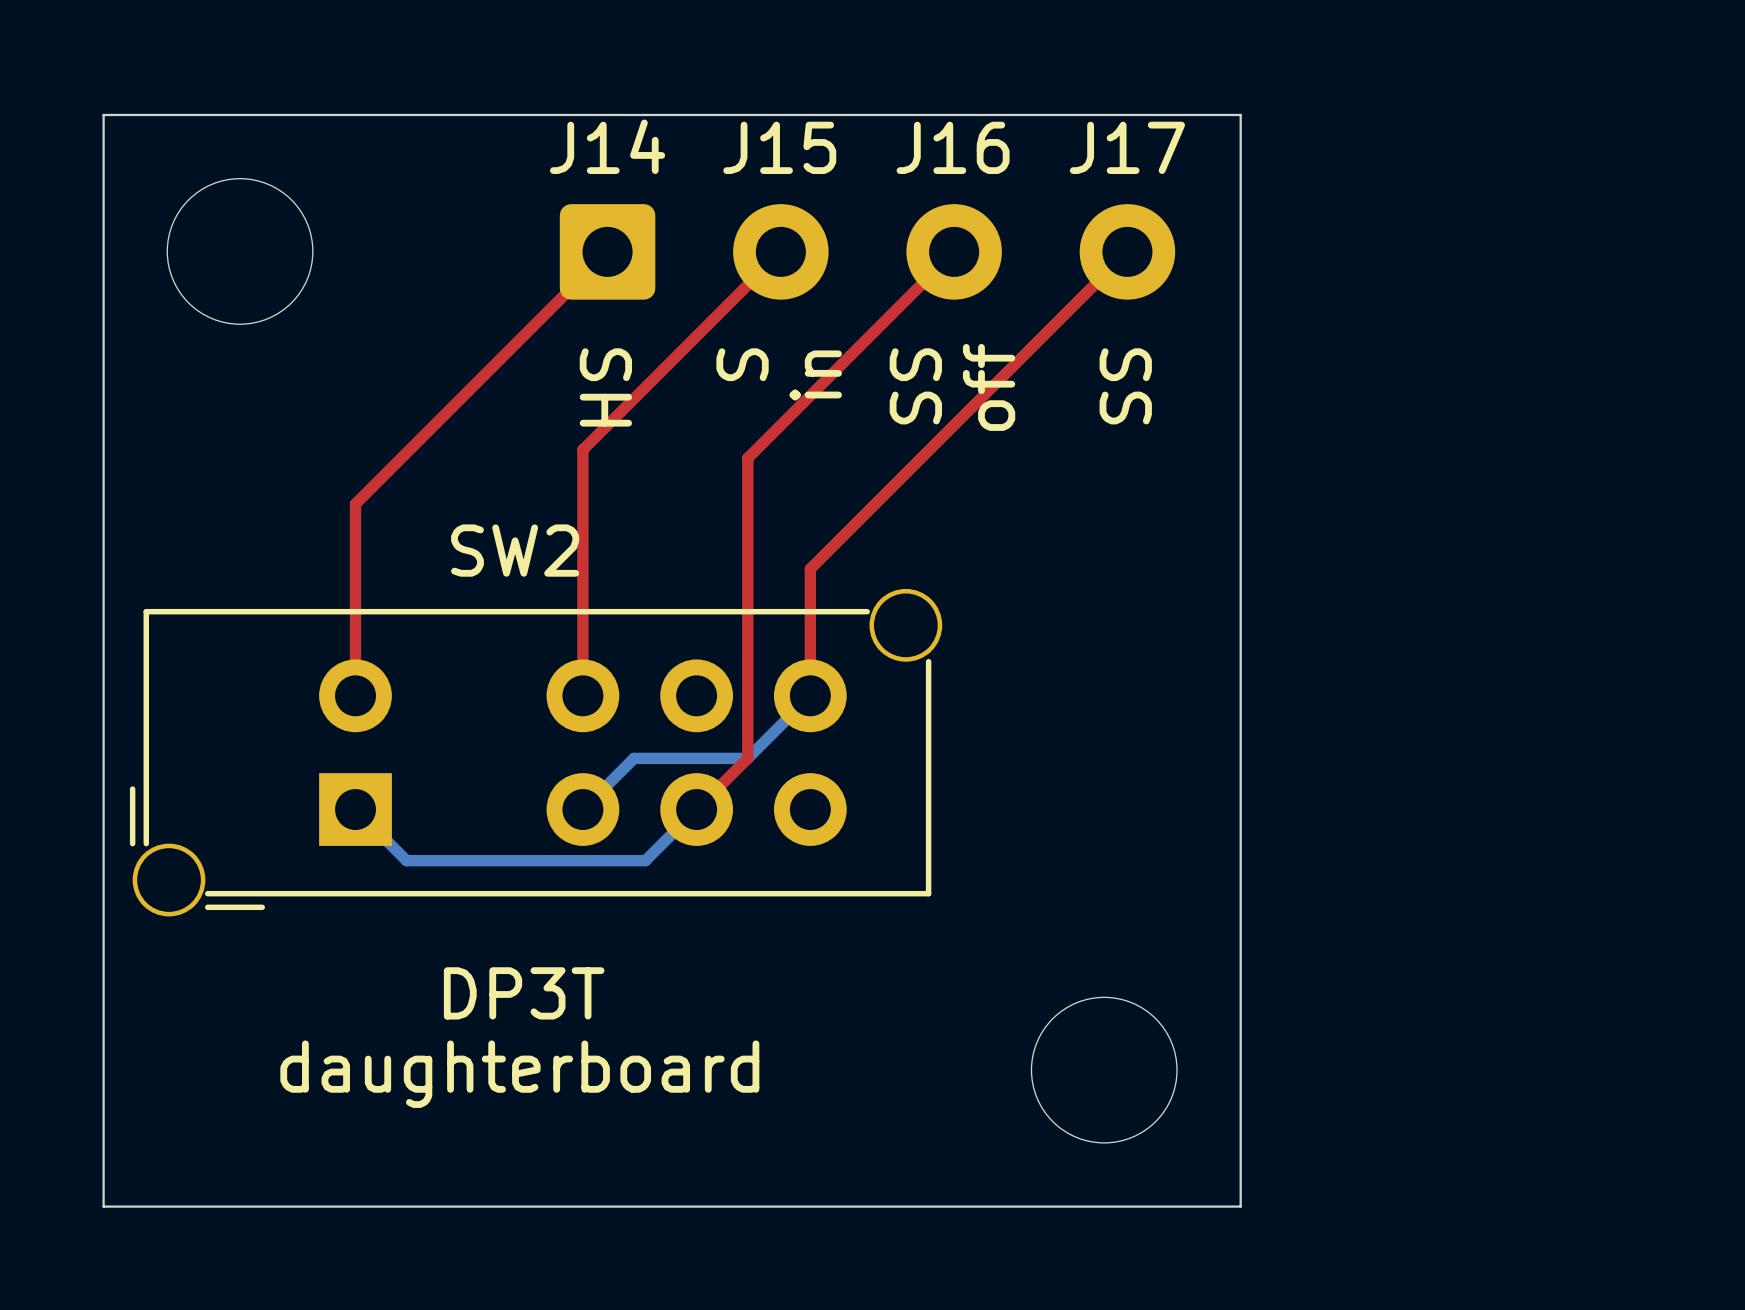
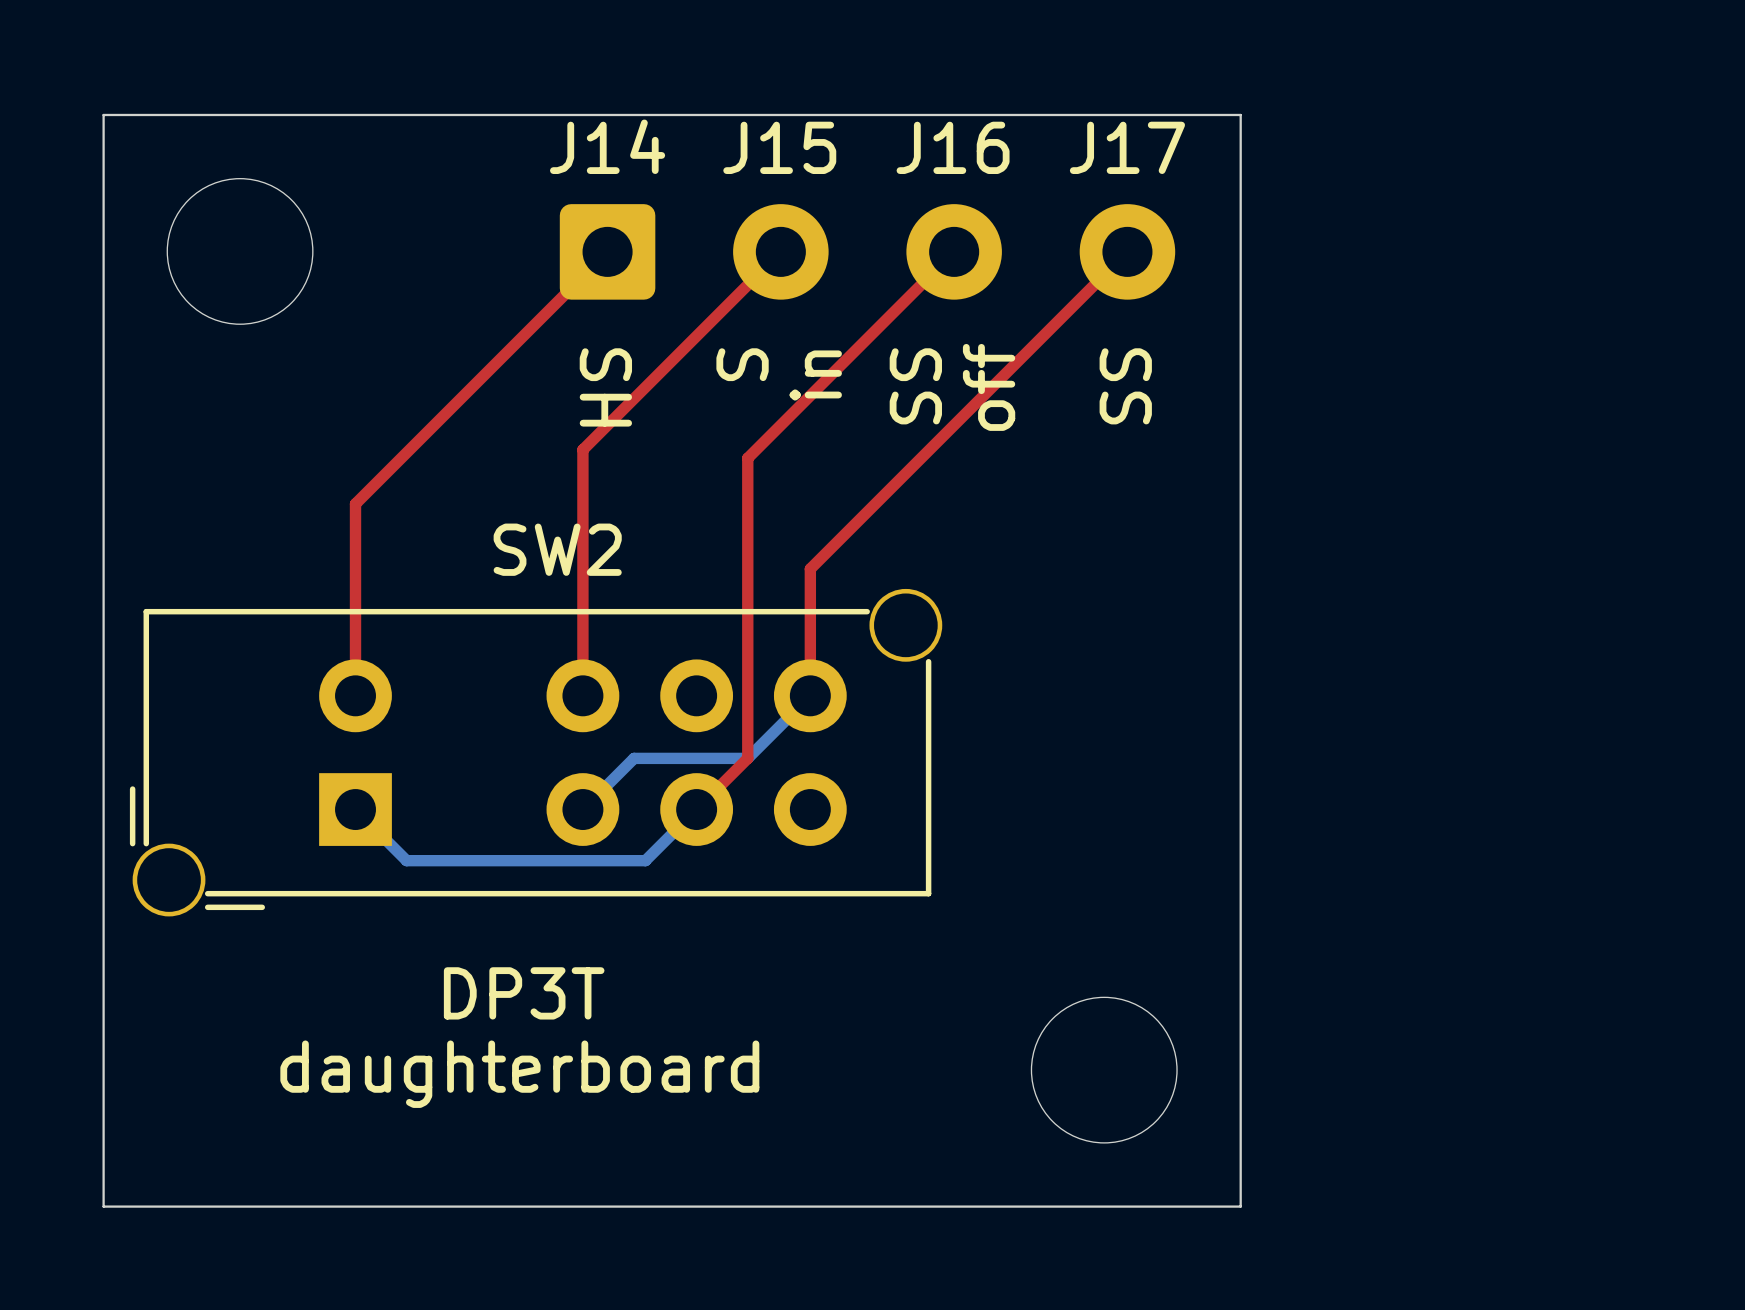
SW2 name position: SW2 (515, 550) -> SW2 (557, 549)

